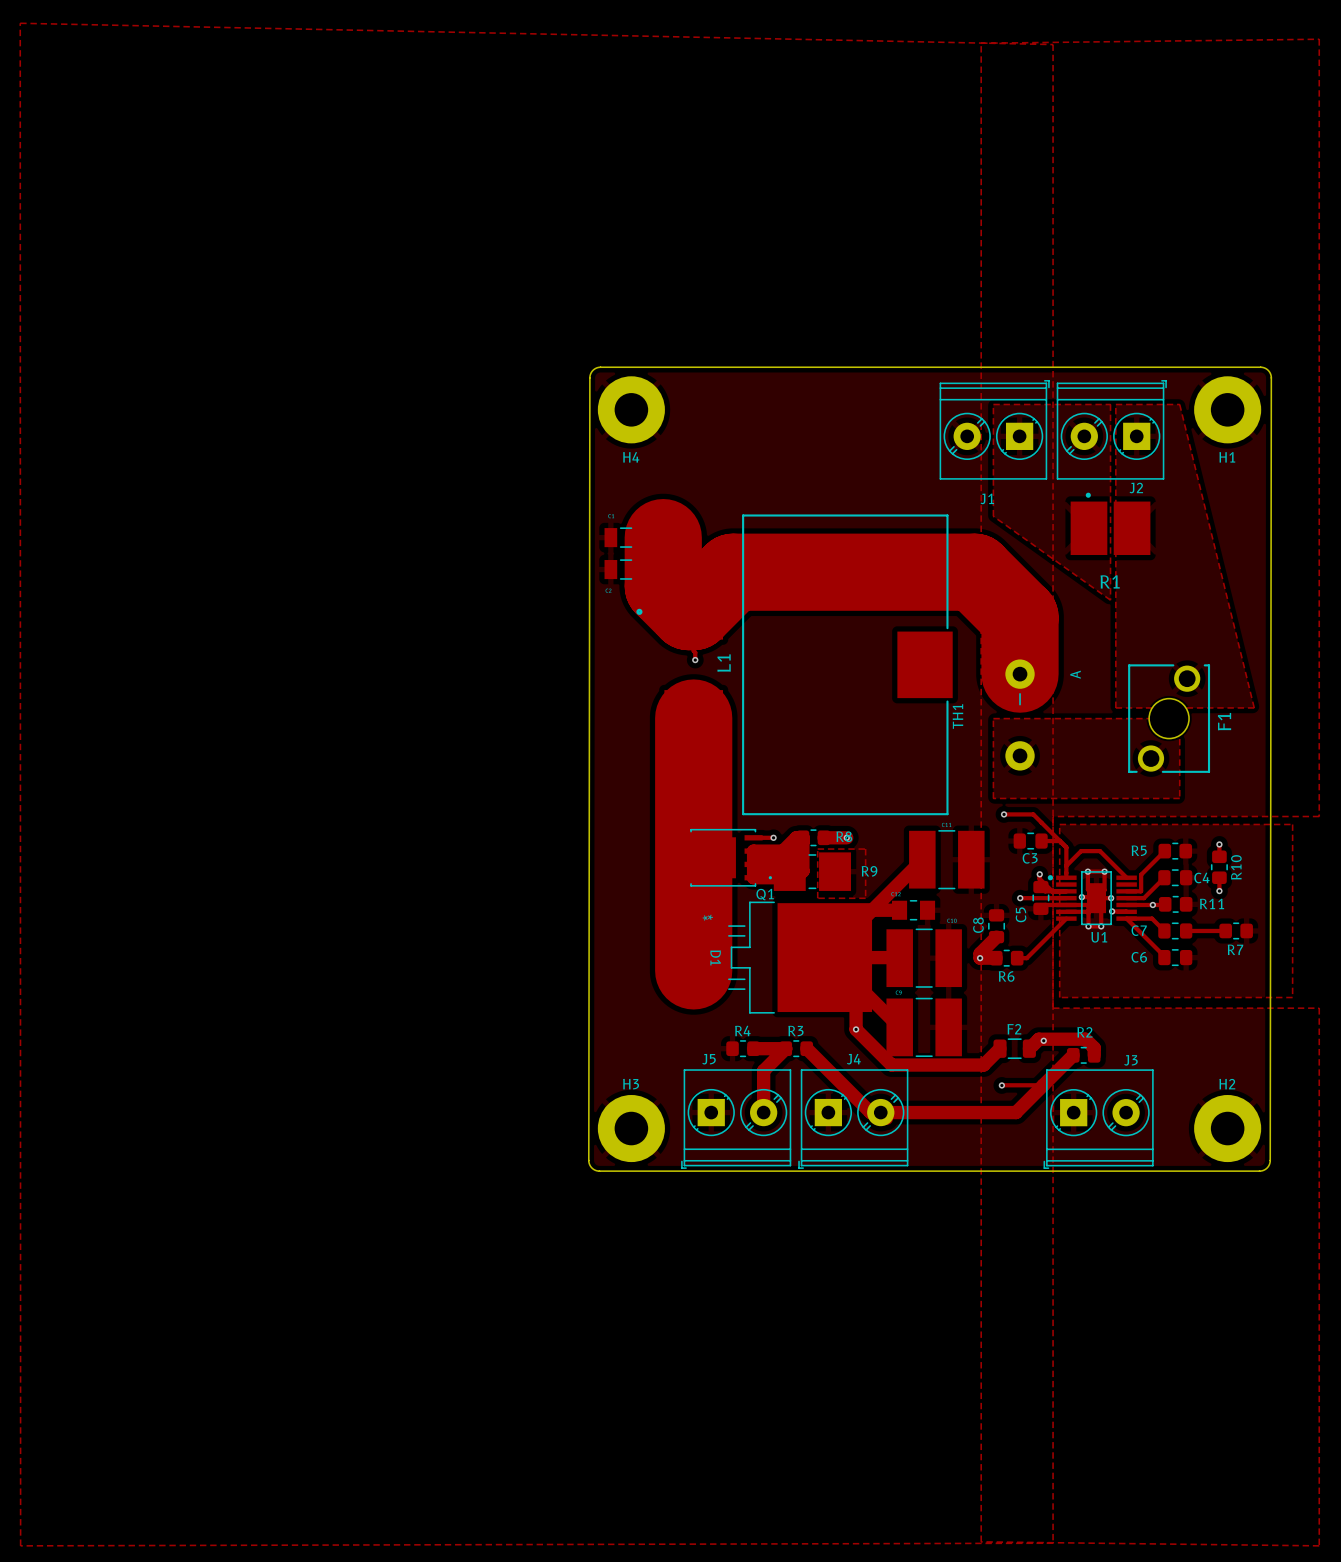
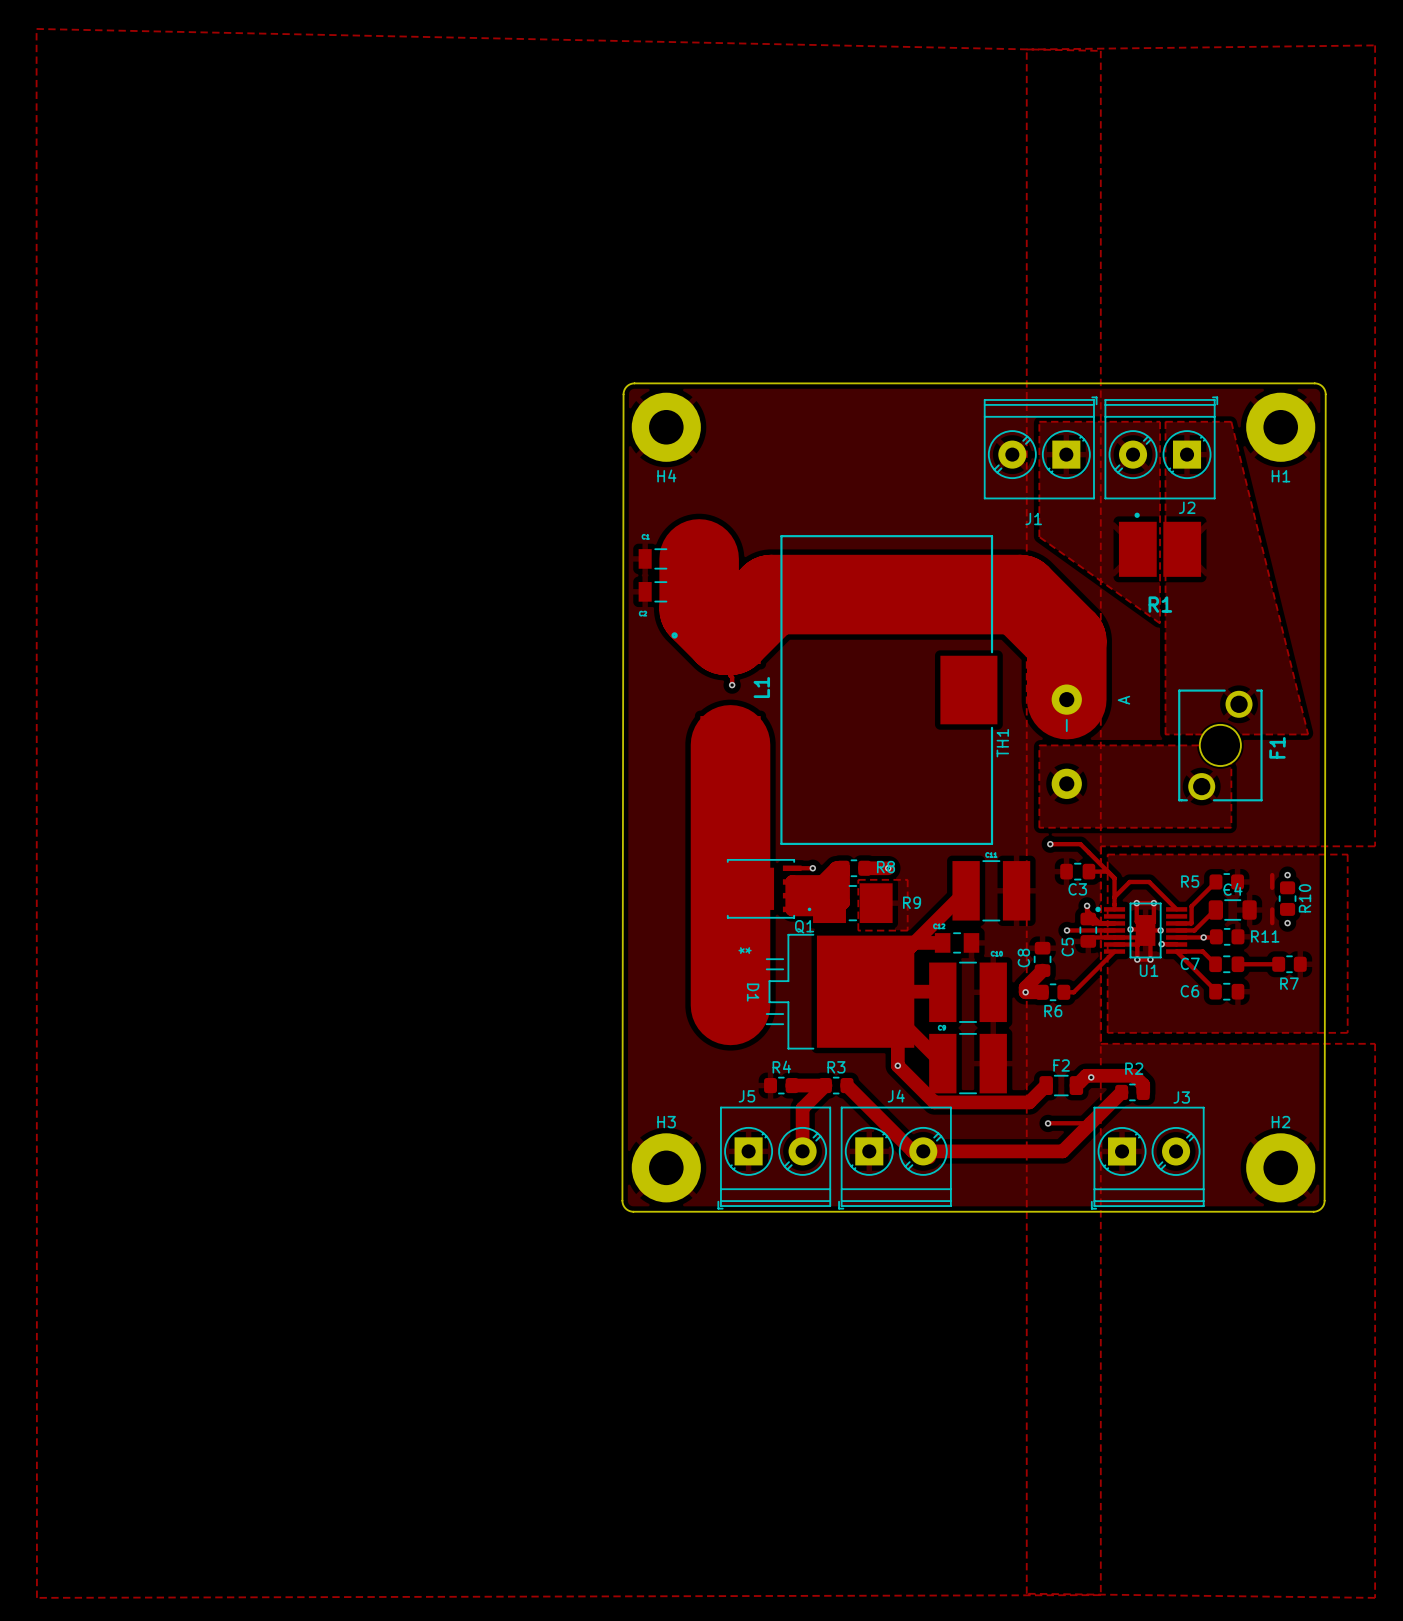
via position: (1219, 844) -> (1287, 875)
R10 position: (1219, 867) -> (1287, 898)
C4 footprint: [1158, 869, 1193, 887] -> [1208, 899, 1257, 921]
C4 name position: C4 (1201, 877) -> C4 (1232, 889)
via position: (1219, 891) -> (1287, 923)

